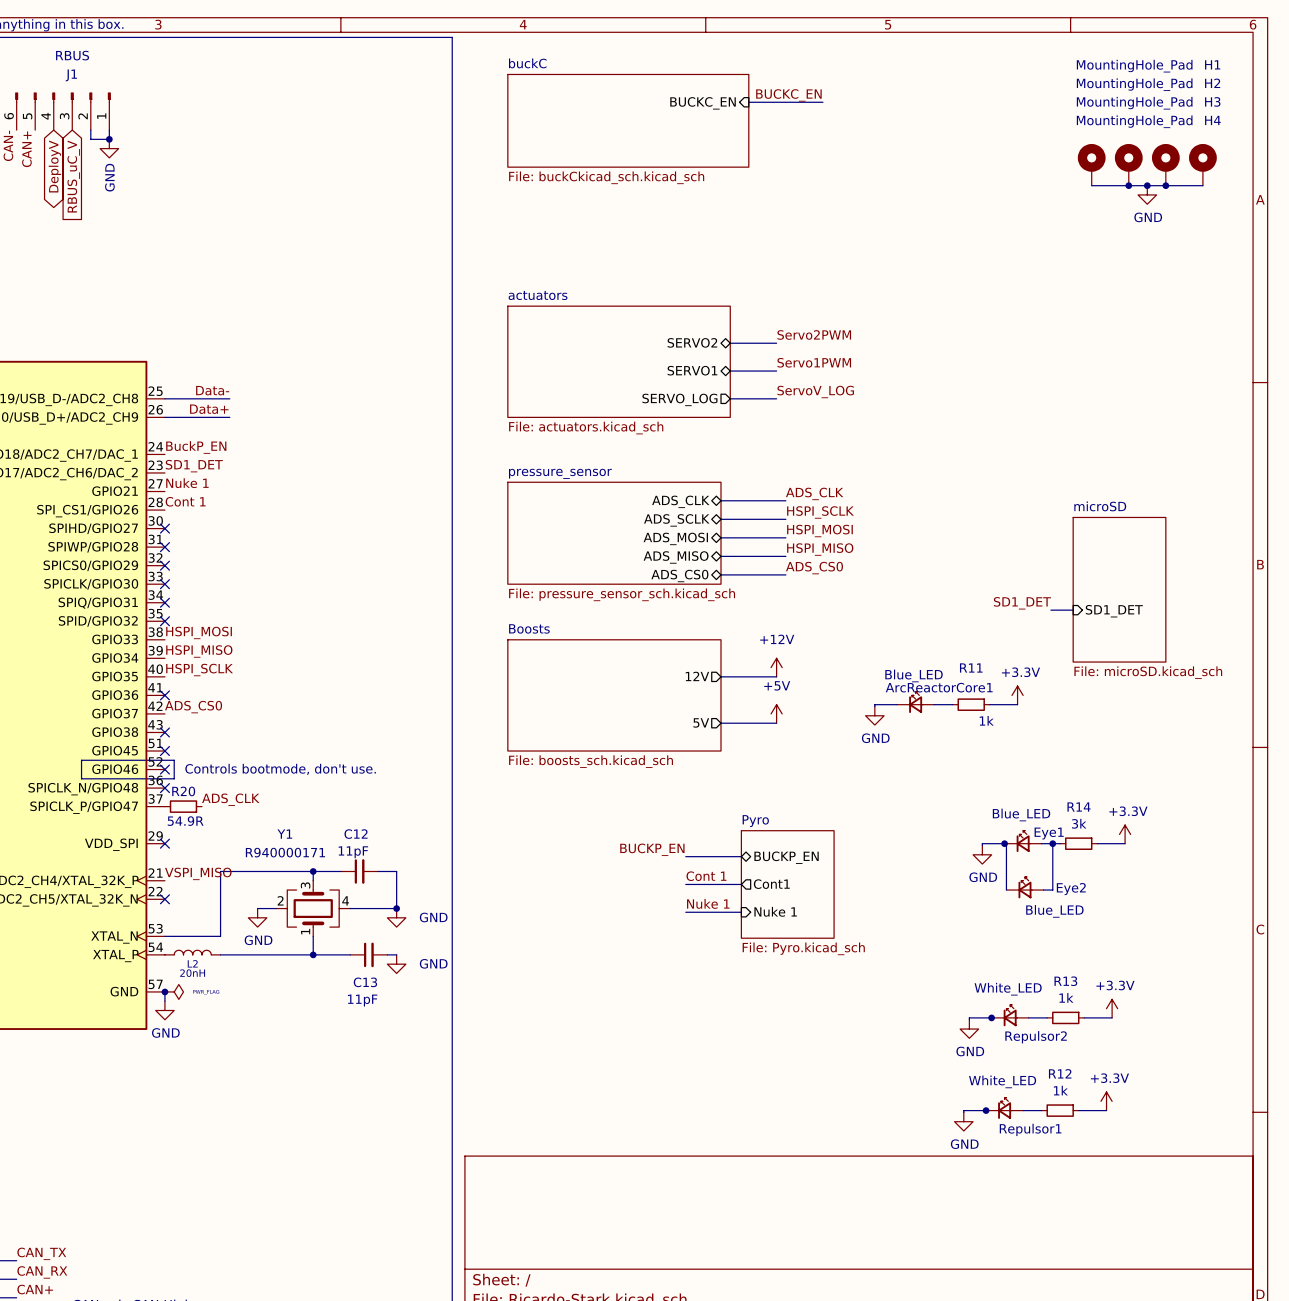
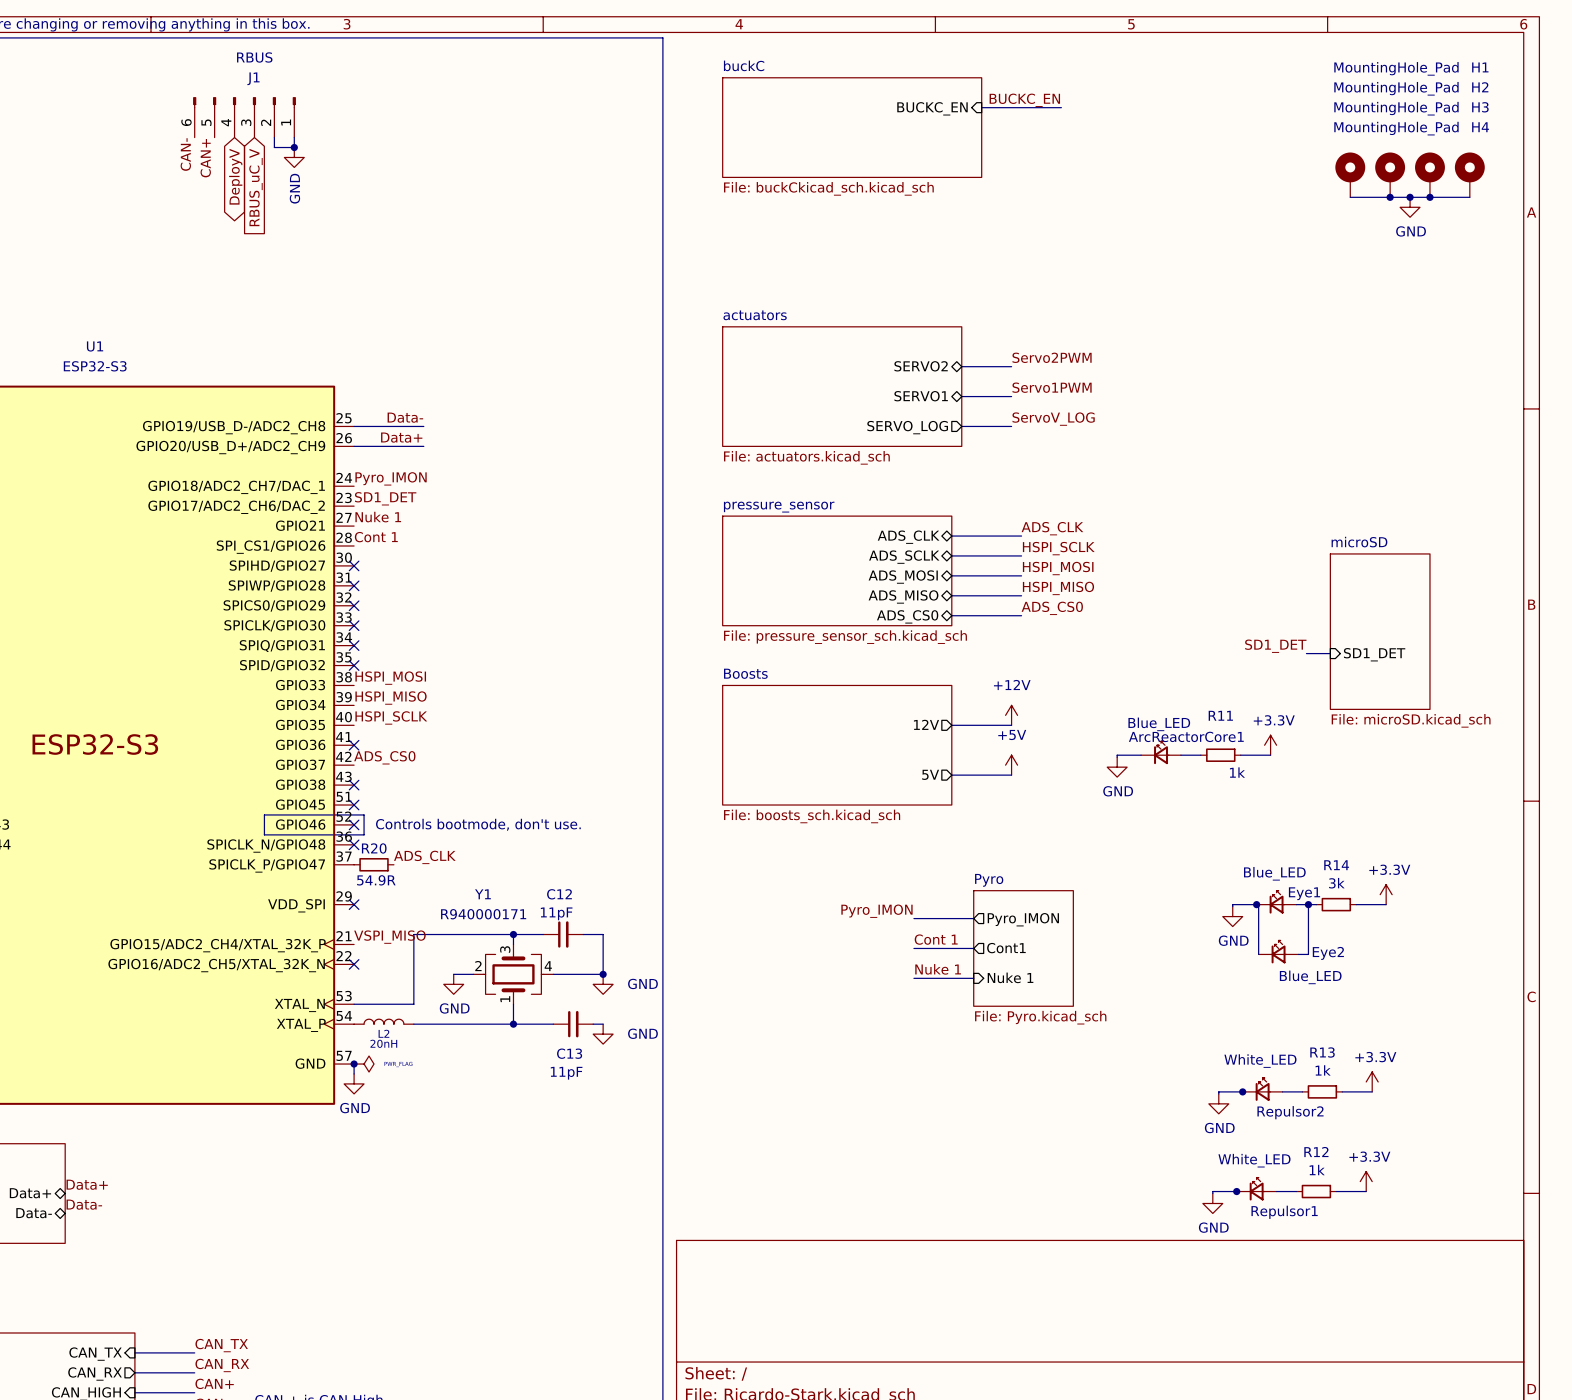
label: BuckP_EN (196, 447) -> Pyro_IMON (391, 478)
label: BUCKP_EN (652, 849) -> Pyro_IMON (876, 911)
sheet pin shape: bidirectional (786, 857) -> output (1023, 919)
sheet pin: BUCKP_EN (786, 857) -> Pyro_IMON (1023, 919)

